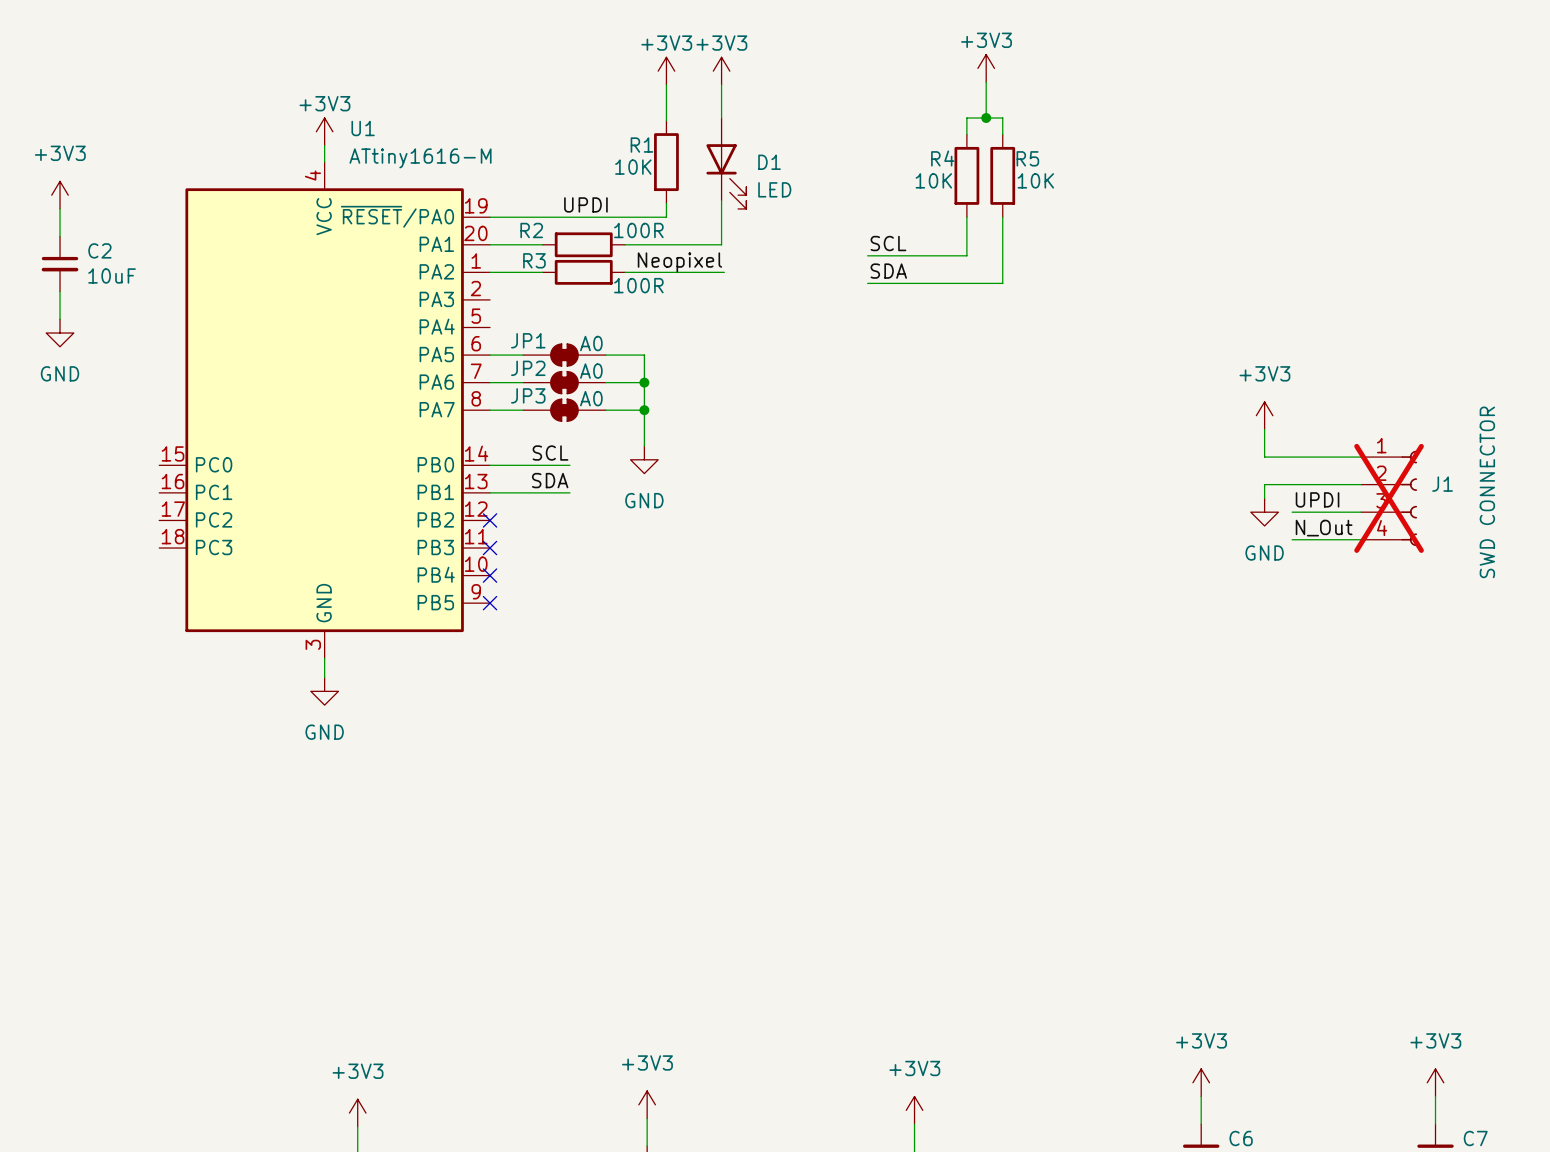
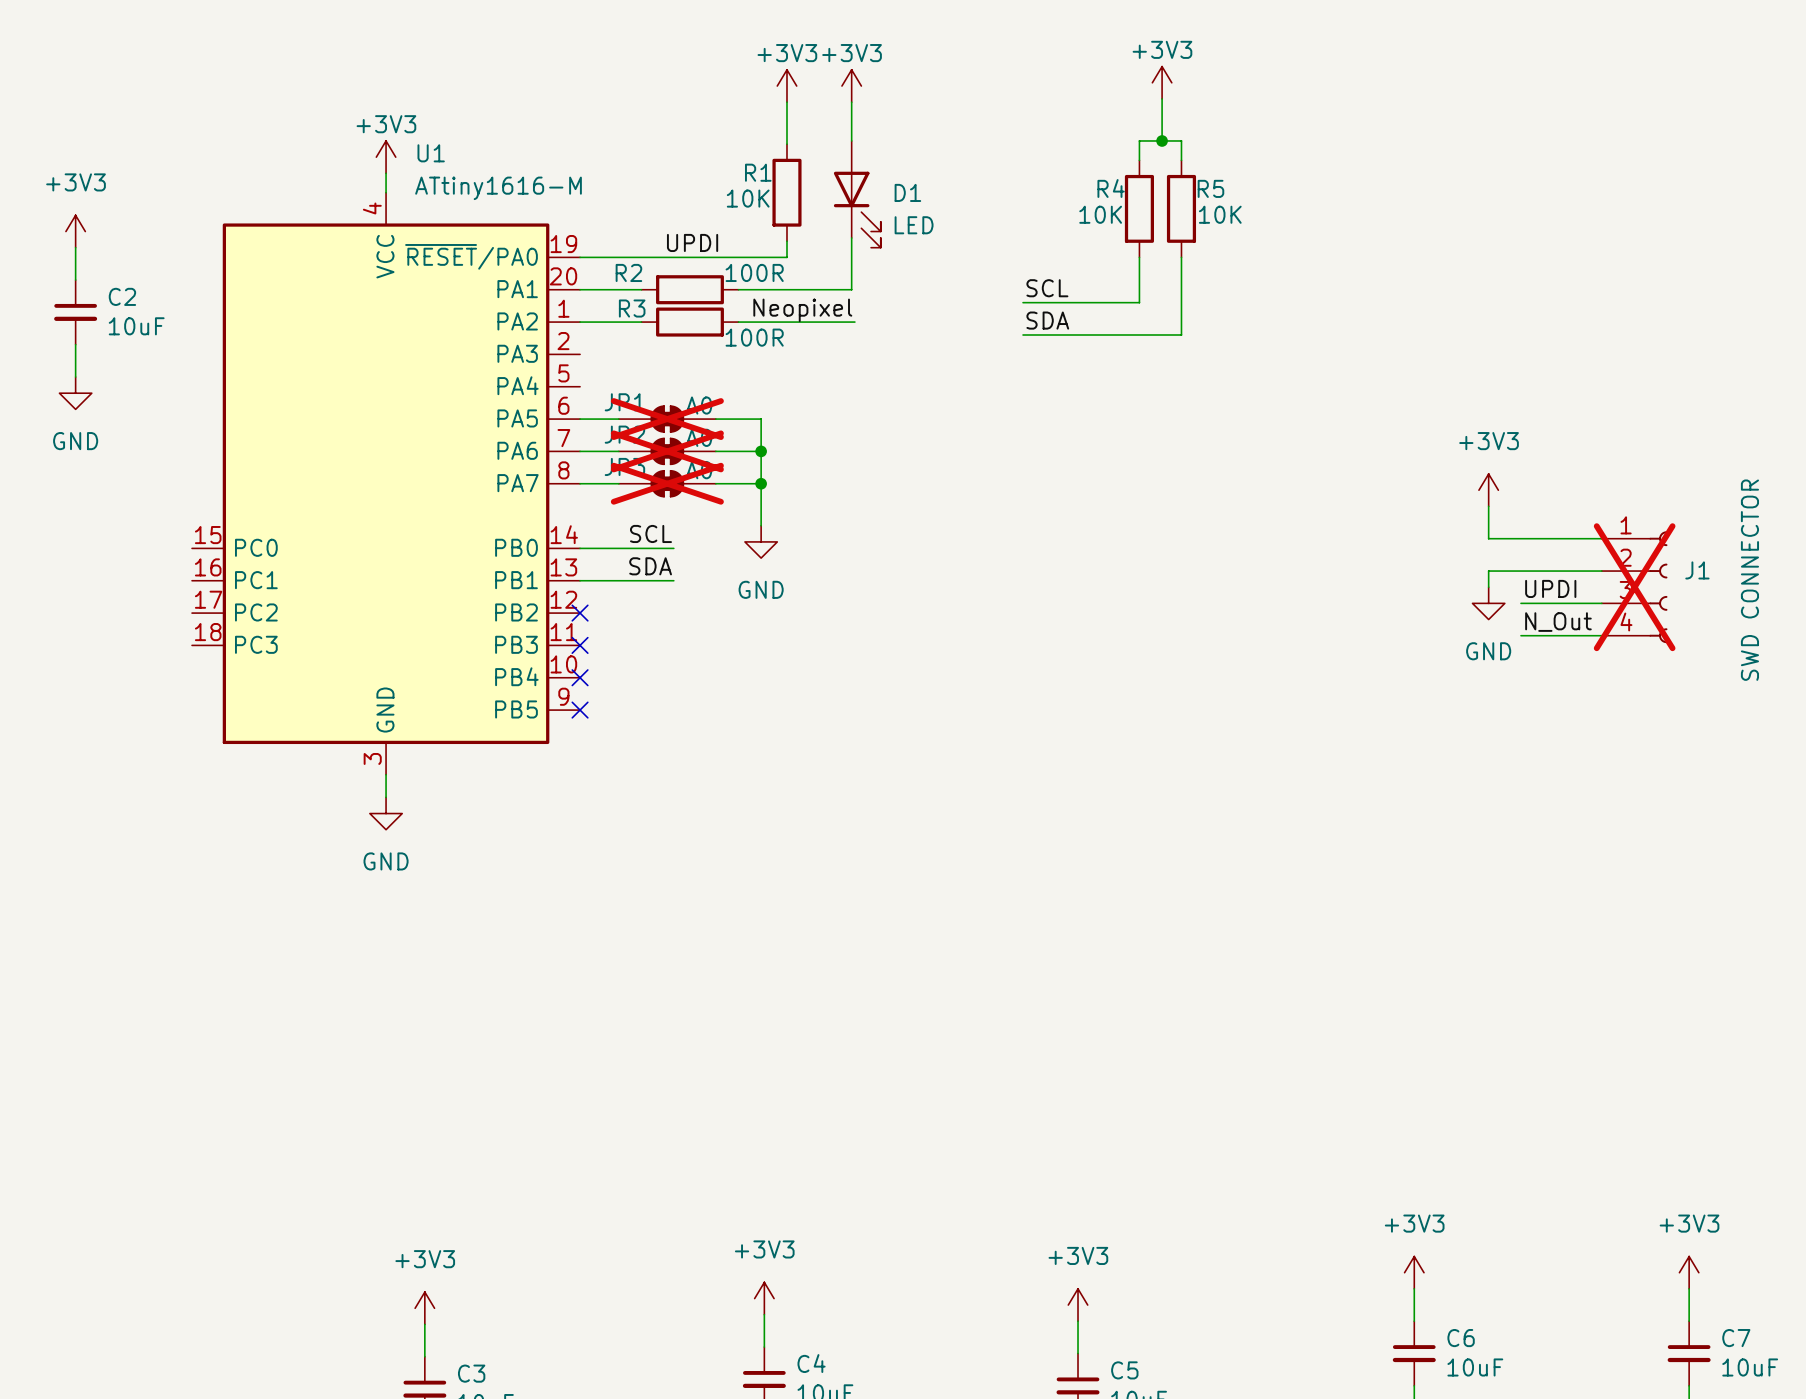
JP1 do-not-place cross: none -> (667, 419)
JP2 do-not-place cross: none -> (667, 451)
JP3 do-not-place cross: none -> (667, 483)

